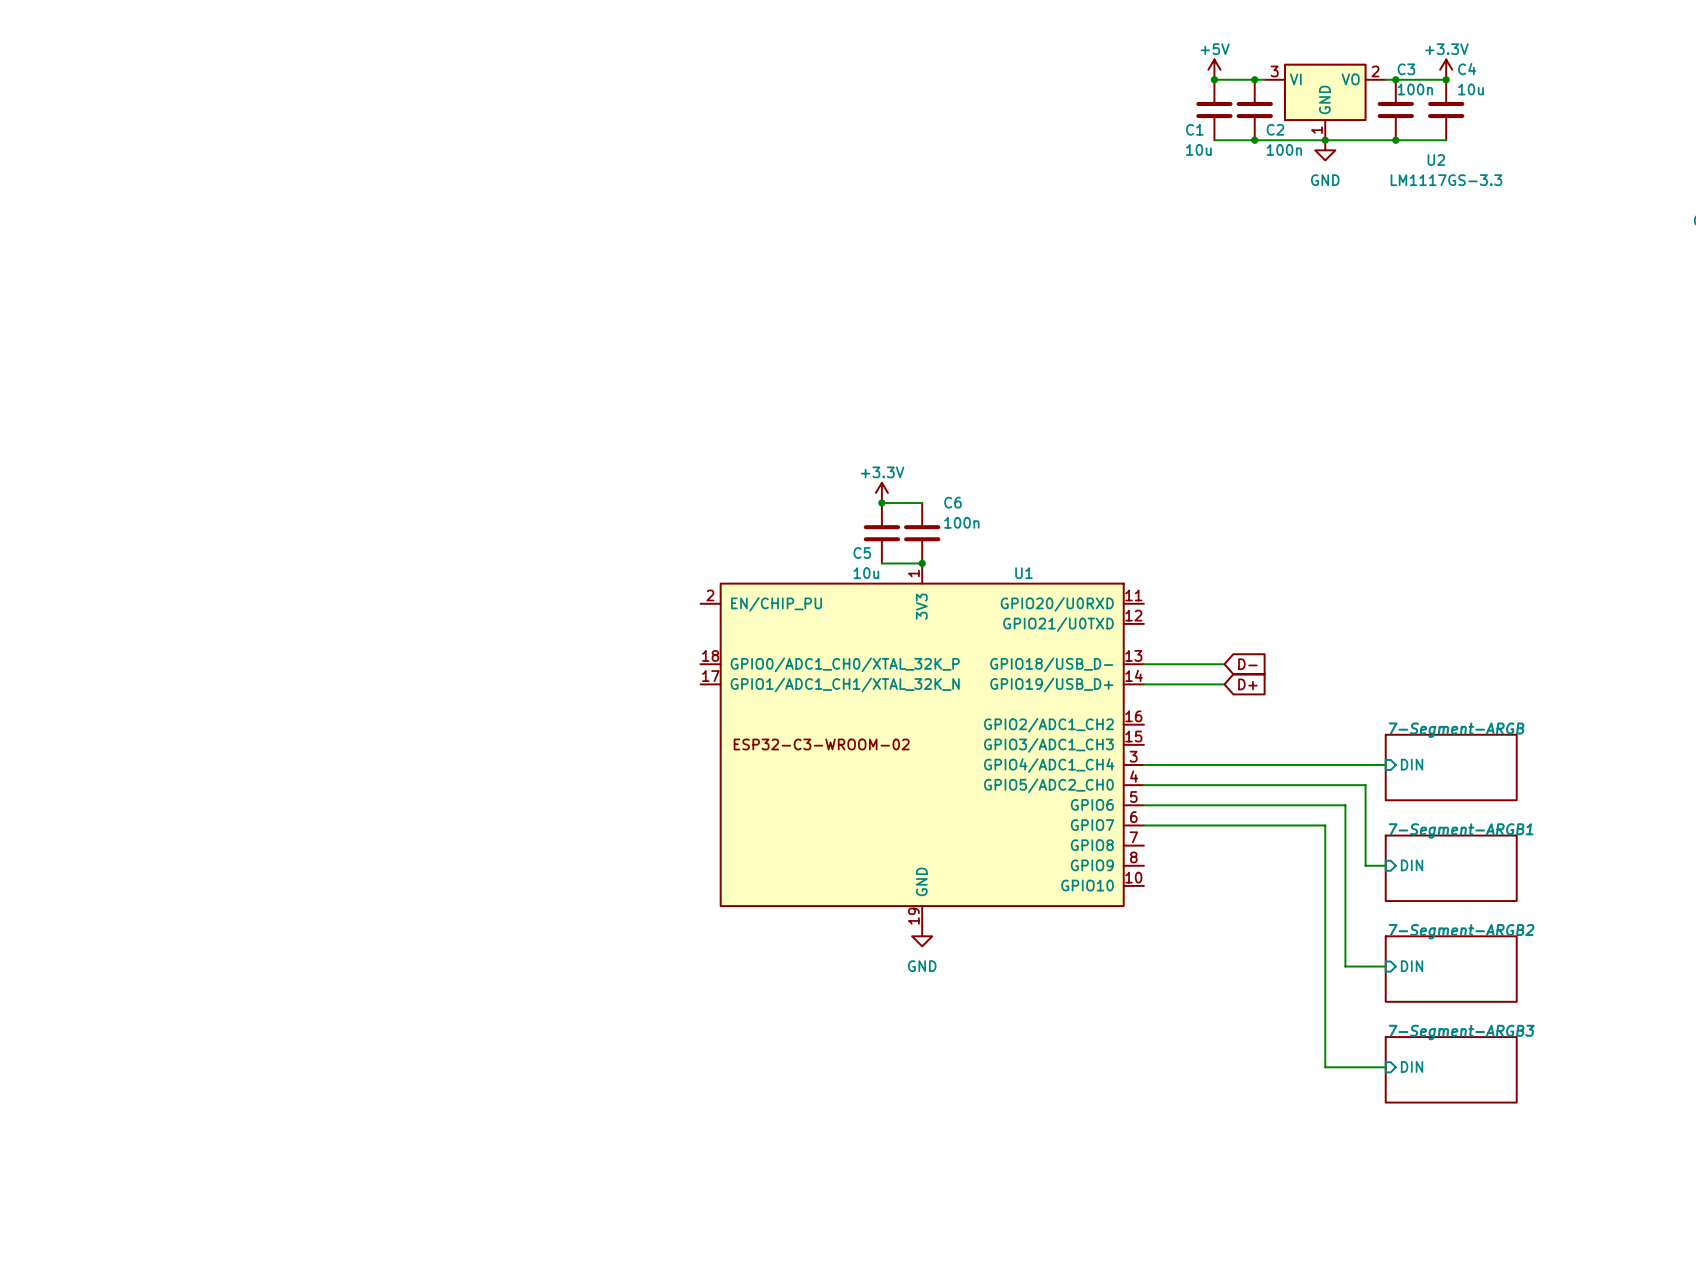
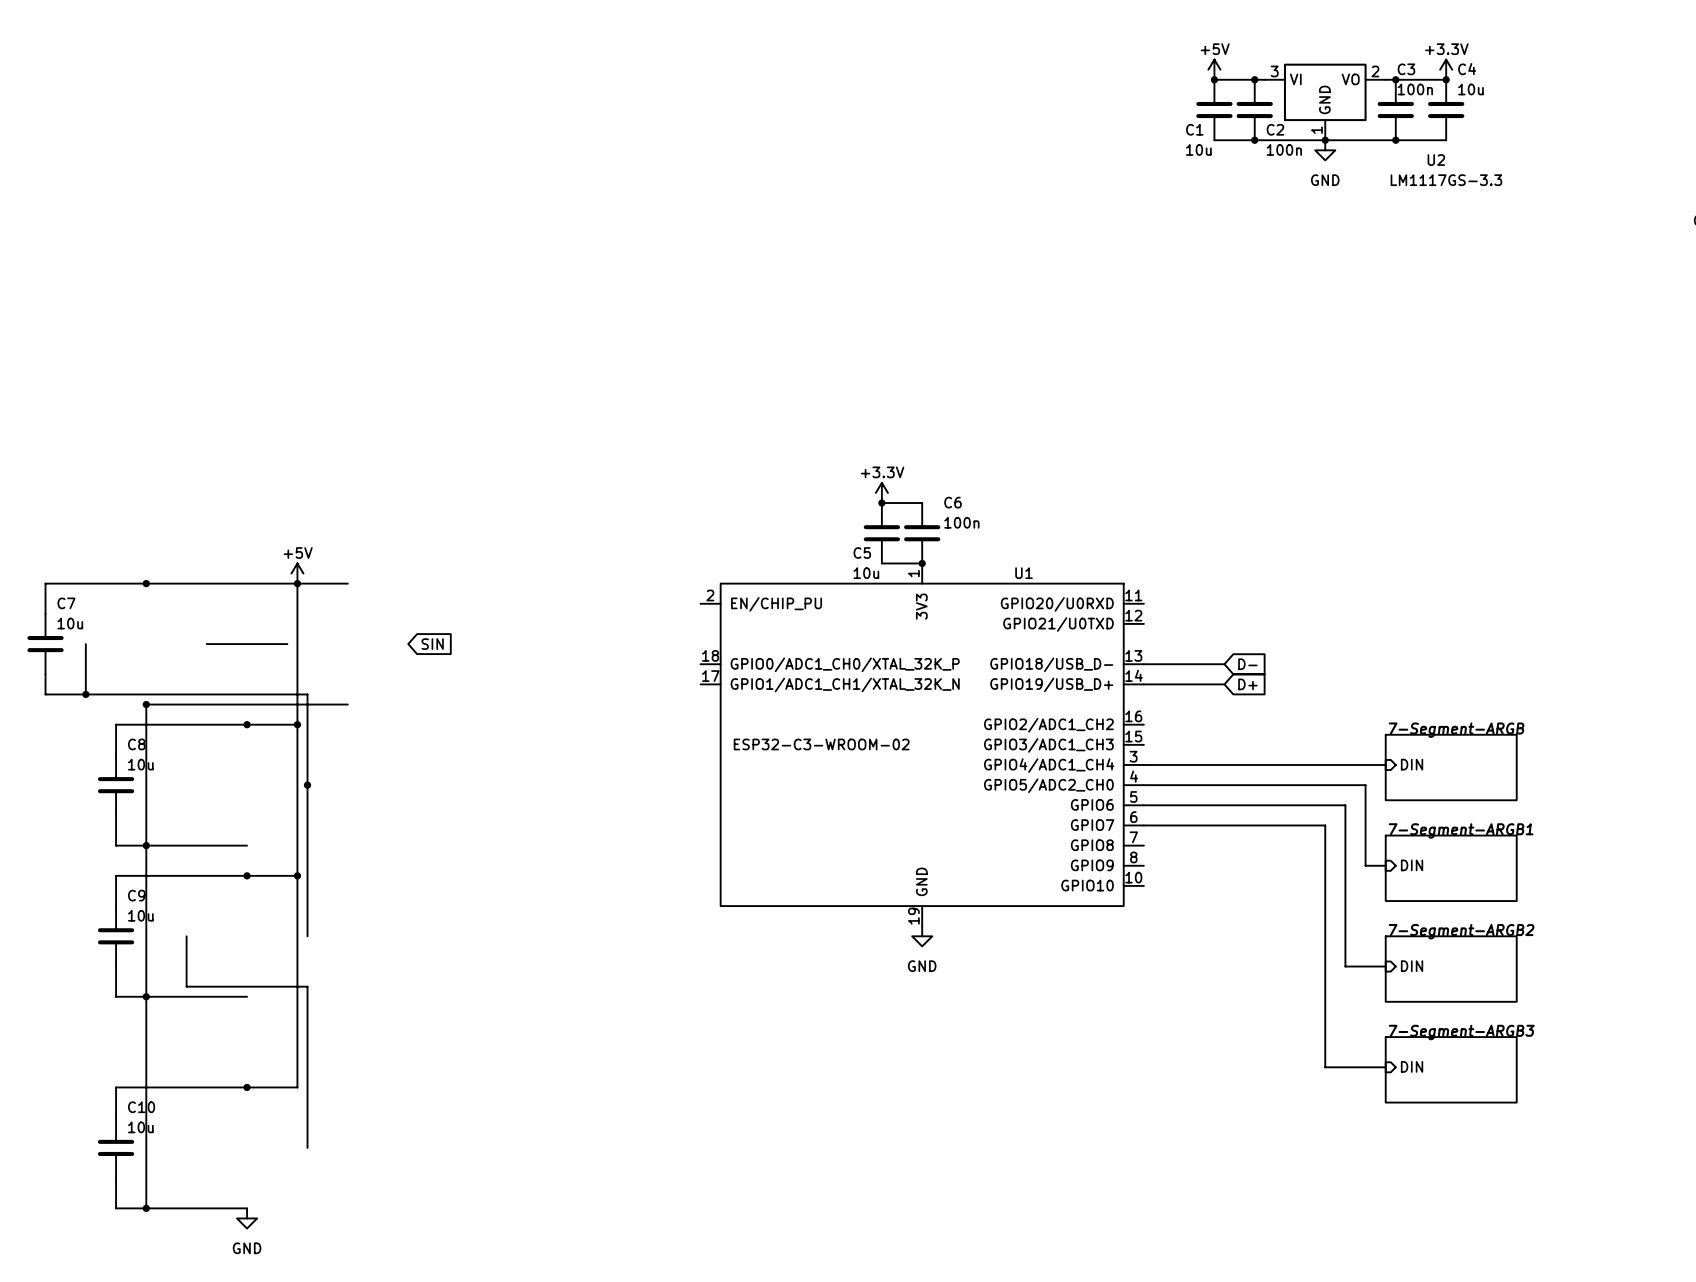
power symbol: none -> +5V (297, 573)
junction: none -> (146, 583)
wire: none -> (297, 583) (297, 1087) (116, 1087) (116, 1117)
junction: none -> (297, 583)
wire: none -> (347, 583) (45, 583) (45, 613)
C7: none -> 10u (45, 644)
wire: none -> (85, 644) (85, 694)
wire: none -> (206, 644) (287, 644)
global label: none -> SIN (432, 644)
wire: none -> (45, 674) (45, 694) (307, 694) (307, 936)
junction: none -> (85, 694)
junction: none -> (146, 704)
wire: none -> (347, 704) (146, 704) (146, 1208)
junction: none -> (247, 724)
wire: none -> (297, 724) (116, 724) (116, 754)
junction: none -> (297, 724)
C8: none -> 10u (116, 785)
junction: none -> (307, 785)
wire: none -> (116, 815) (116, 845) (247, 845)
junction: none -> (146, 845)
junction: none -> (247, 875)
wire: none -> (297, 875) (116, 875) (116, 906)
junction: none -> (297, 875)
C9: none -> 10u (116, 936)
wire: none -> (186, 936) (186, 986) (307, 986) (307, 1147)
wire: none -> (116, 966) (116, 996) (247, 996)
junction: none -> (146, 996)
junction: none -> (247, 1087)
C10: none -> 10u (116, 1147)
wire: none -> (116, 1178) (116, 1208) (247, 1208)
junction: none -> (146, 1208)
power symbol: none -> GND (247, 1218)

